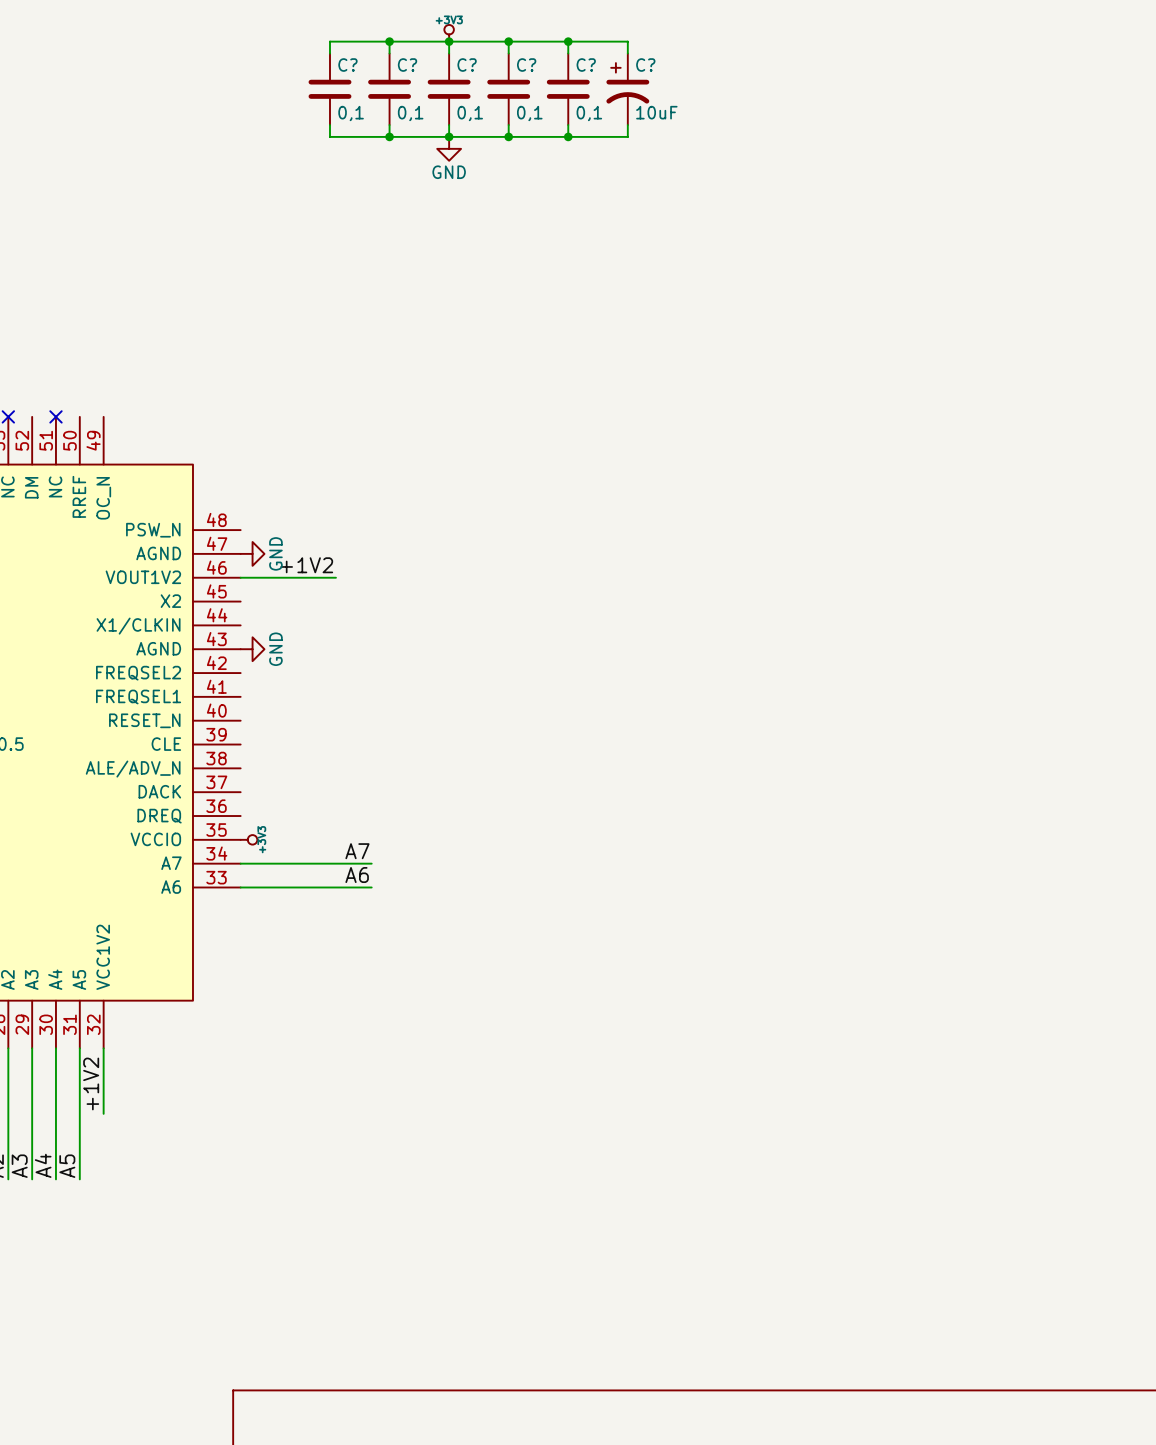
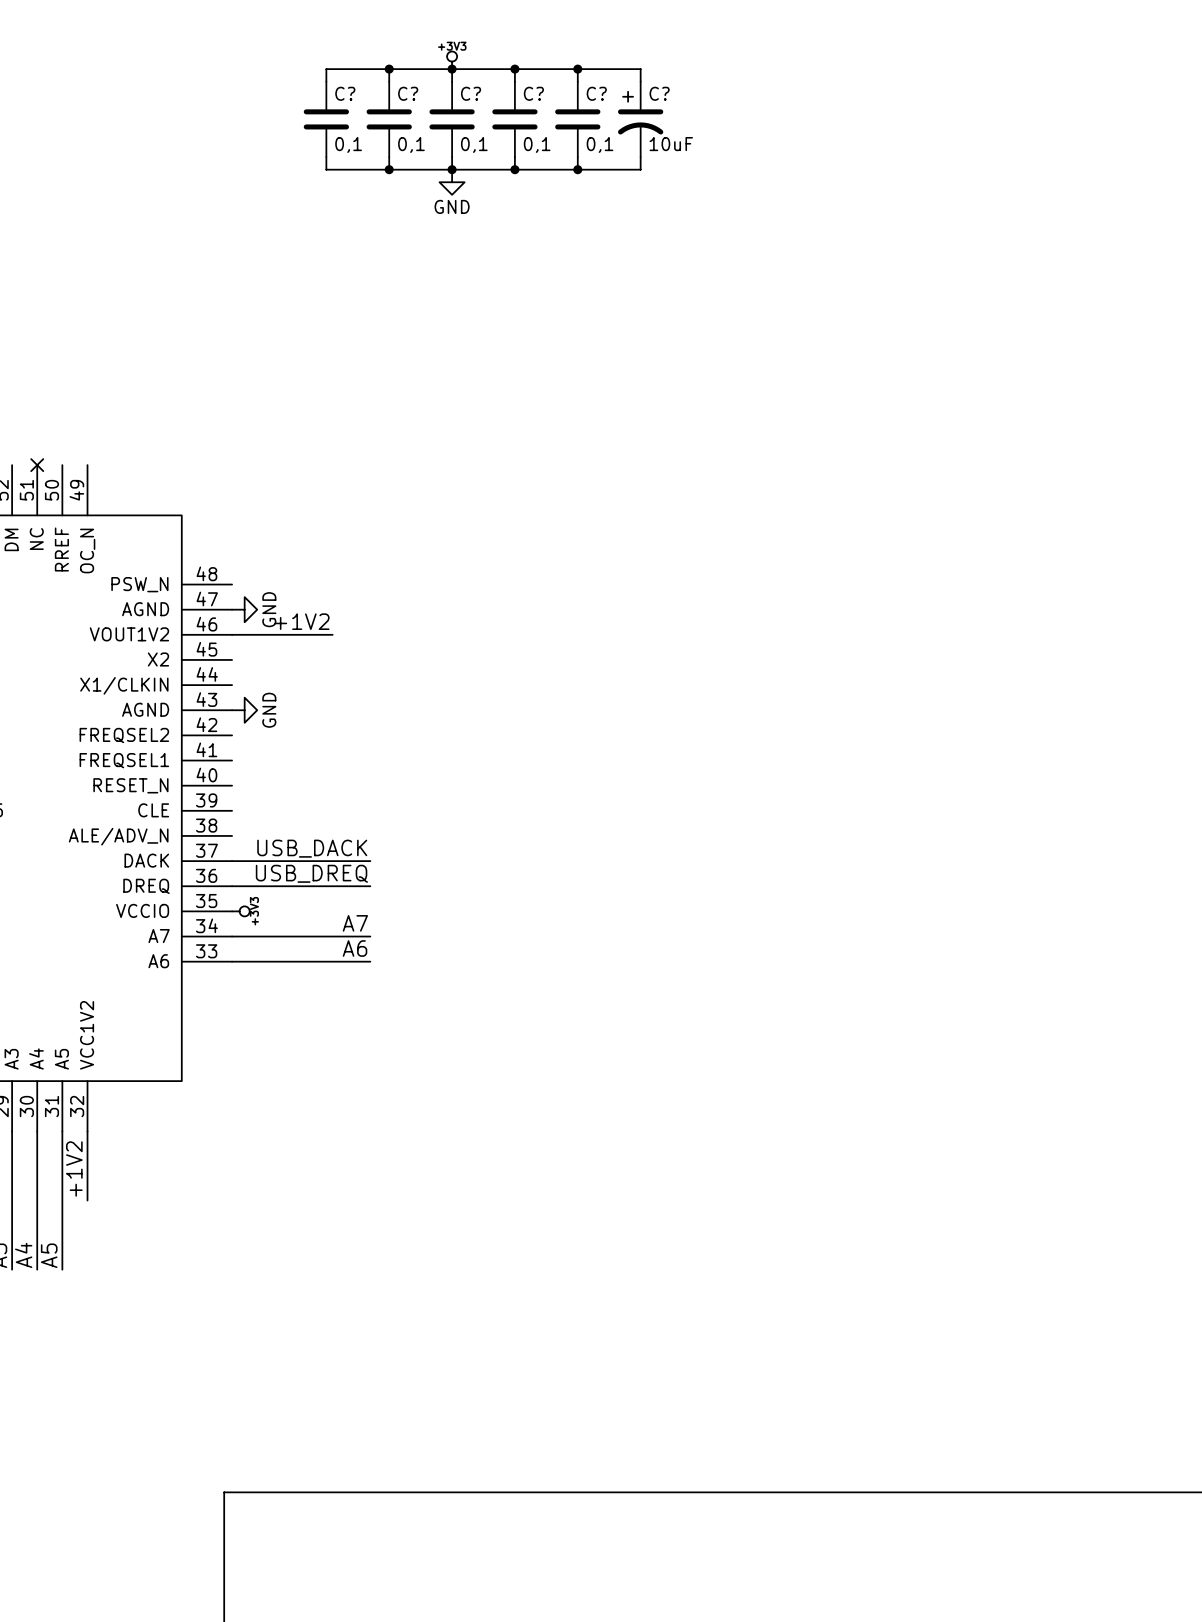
label: none -> USB_DACK (312, 848)
wire: none -> (232, 861) (370, 861)
label: none -> USB_DREQ (311, 873)
wire: none -> (232, 886) (370, 886)

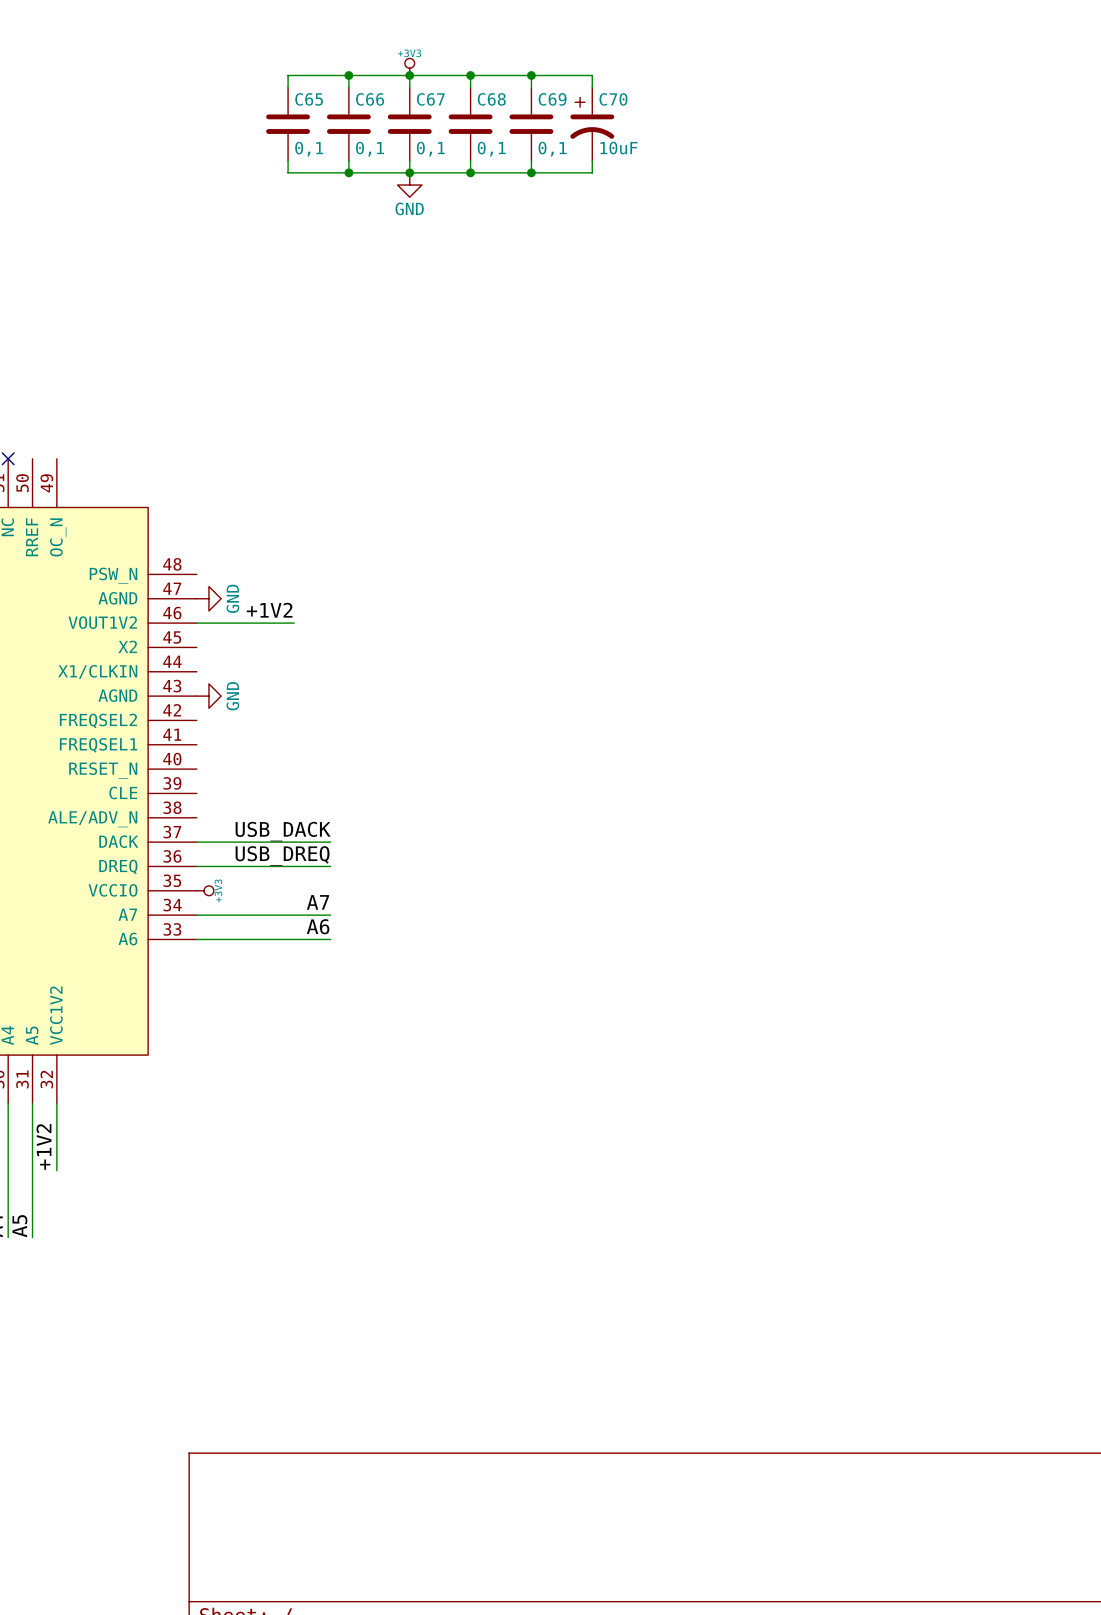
C? name: C? (345, 93) -> C65 (309, 99)
C? name: C? (408, 93) -> C66 (370, 99)
C? name: C? (471, 93) -> C67 (430, 99)
C? name: C? (533, 93) -> C68 (491, 99)
C? name: C? (596, 93) -> C69 (552, 99)
C? name: C? (659, 93) -> C70 (613, 99)

